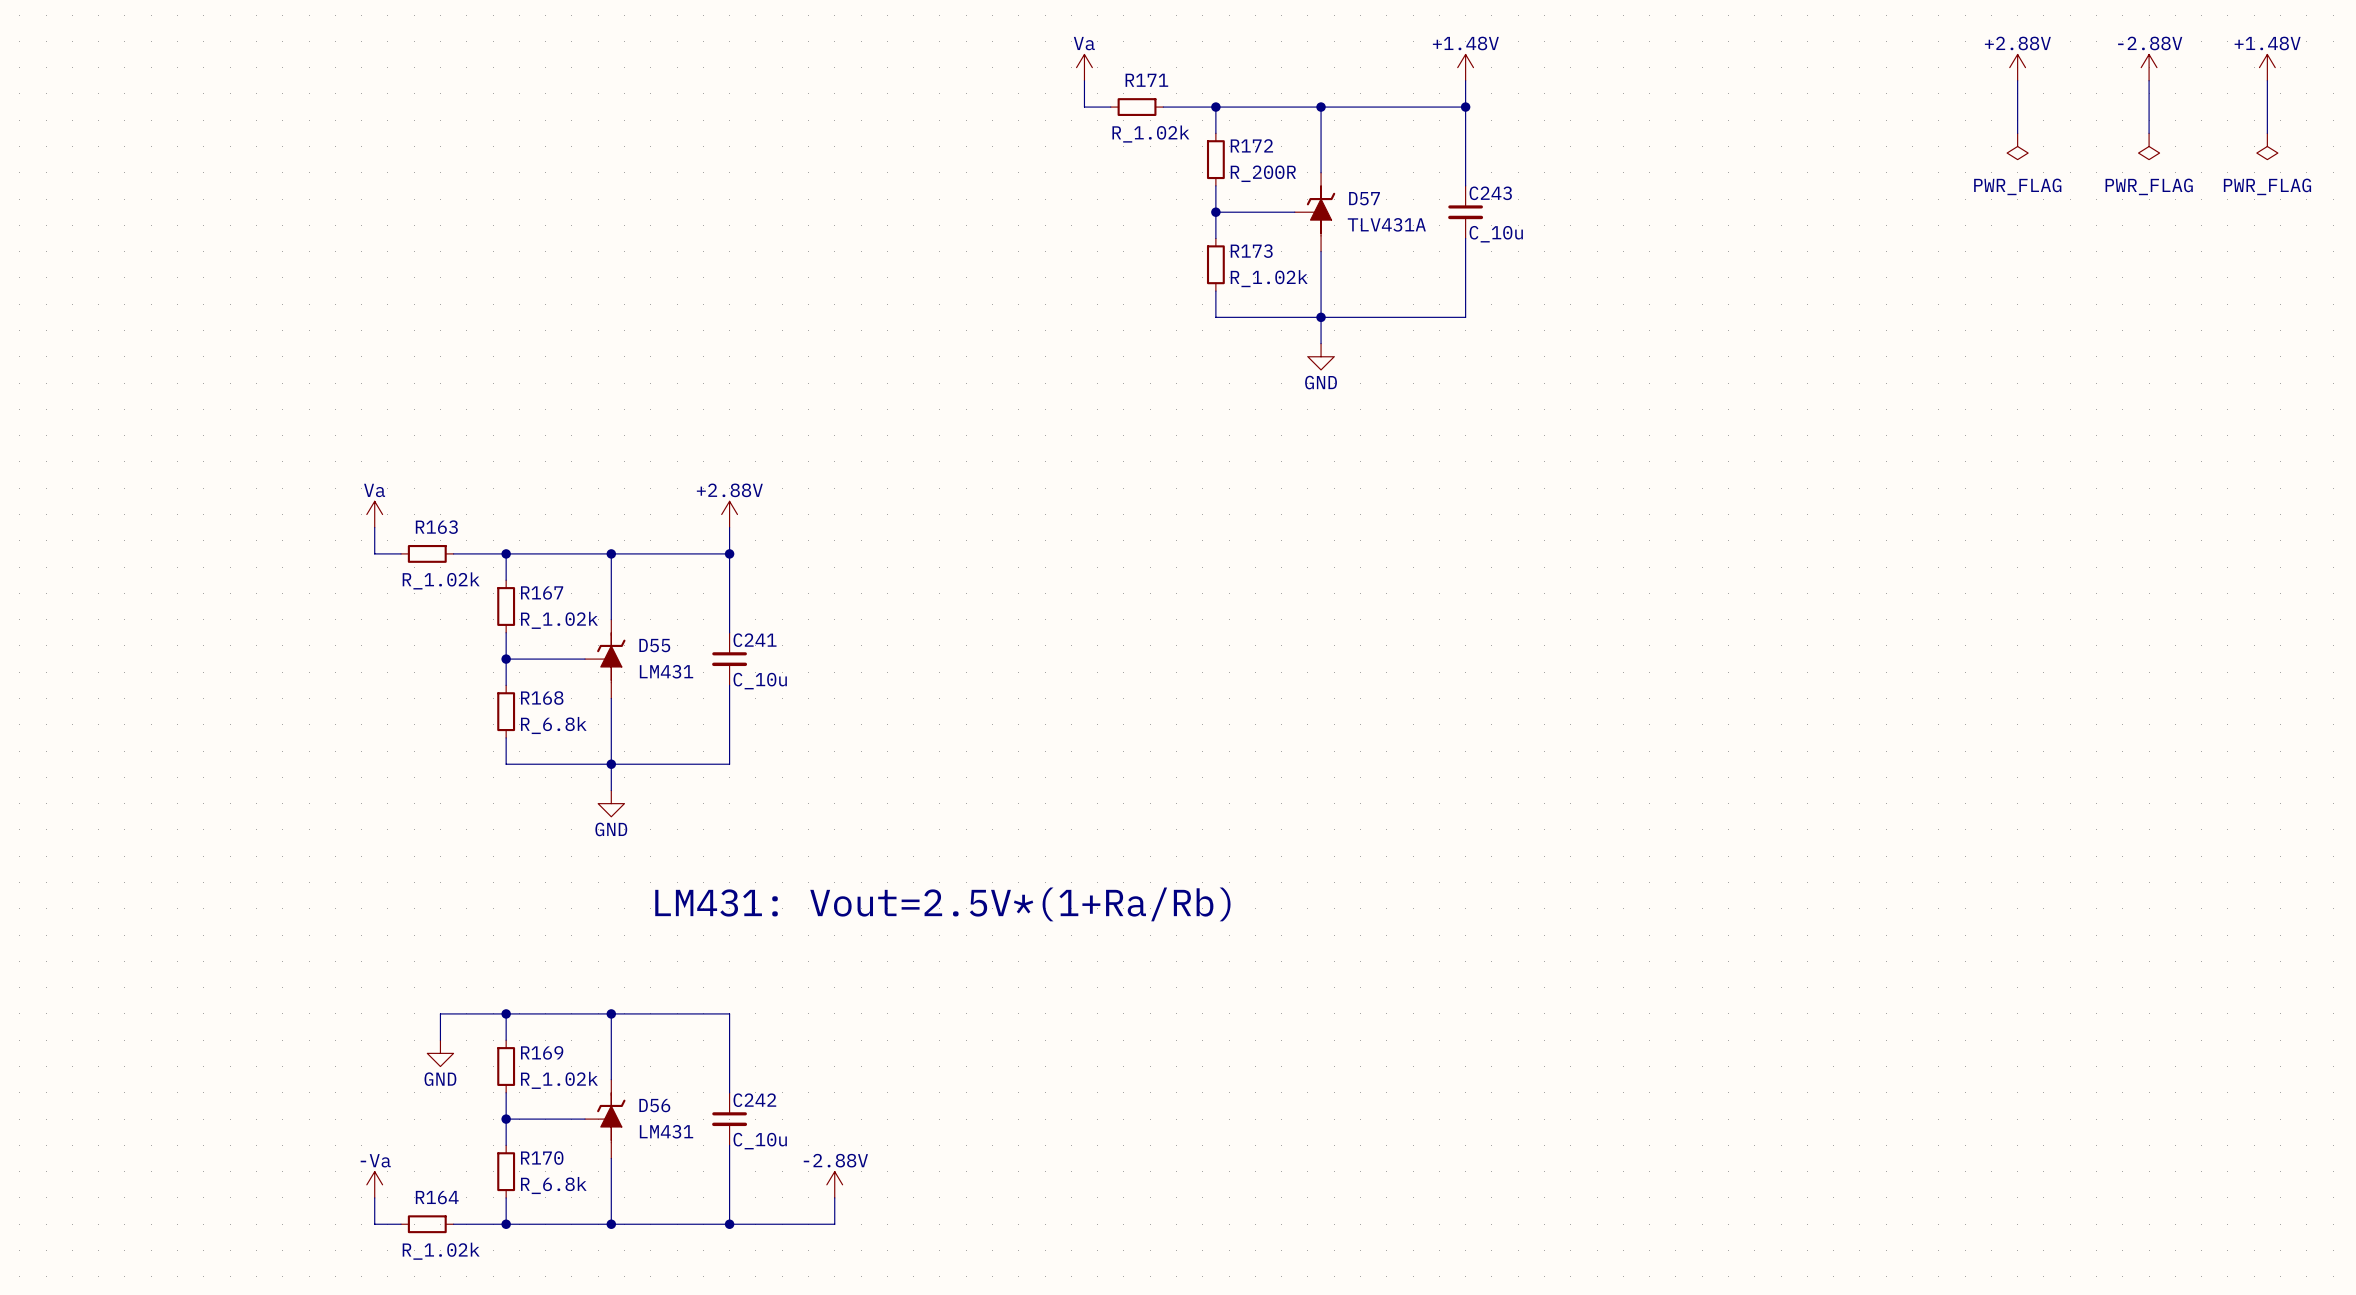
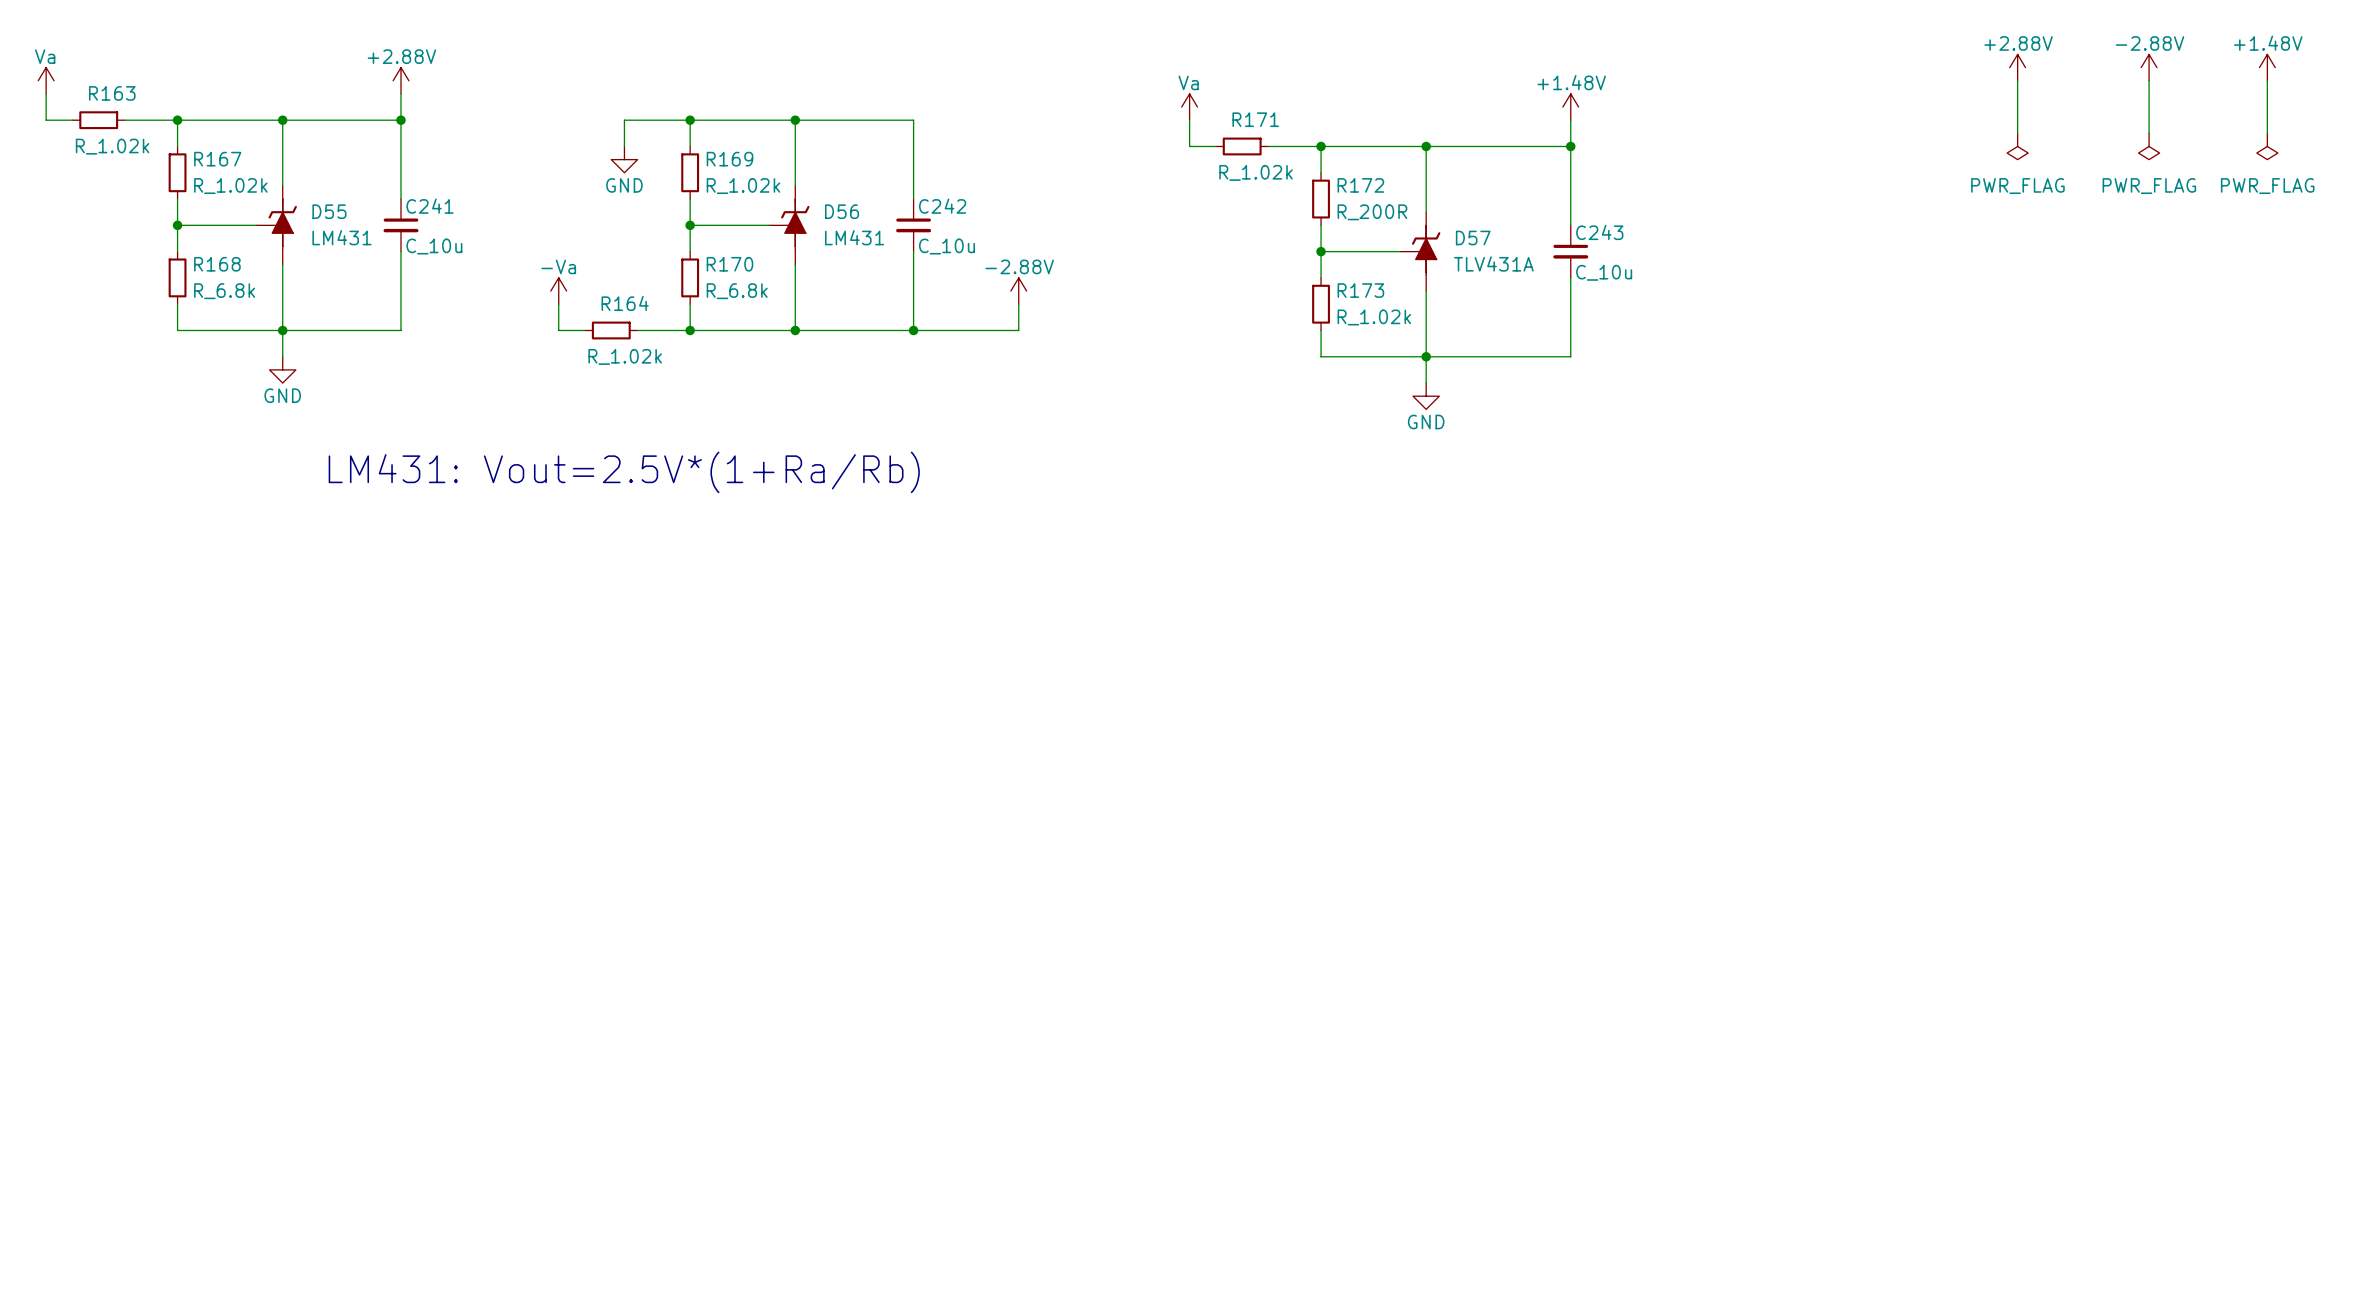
power symbol position: Va (1084, 67) -> Va (1189, 107)
power symbol position: +1.48V (1465, 67) -> +1.48V (1570, 107)
power symbol: none -> Va (46, 80)
power symbol: none -> +2.88V (401, 80)
wire: (1084, 80) (1084, 107) (1110, 107) -> (1189, 120) (1189, 146) (1215, 146)
wire: (1465, 80) (1465, 185) -> (1570, 120) (1570, 225)
wire: none -> (46, 93) (46, 120) (72, 120)
wire: none -> (401, 93) (401, 199)
R171 position: (1137, 107) -> (1242, 146)
wire: (1163, 107) (1465, 107) -> (1268, 146) (1570, 146)
wire: (1215, 107) (1215, 133) -> none
junction: (1215, 107) -> none
wire: (1321, 107) (1321, 146) -> none
junction position: (1321, 107) -> (1321, 146)
junction position: (1465, 107) -> (1426, 146)
wire: none -> (124, 120) (401, 120)
wire: none -> (177, 120) (177, 146)
junction: none -> (177, 120)
wire: none -> (282, 120) (282, 185)
junction: none -> (282, 120)
junction: none -> (401, 120)
wire: none -> (690, 120) (690, 146)
junction: none -> (690, 120)
wire: none -> (795, 120) (795, 185)
junction: none -> (795, 120)
wire: none -> (624, 146) (624, 120) (913, 120) (913, 199)
wire: none -> (1426, 146) (1426, 212)
junction: none -> (1570, 146)
power symbol: none -> GND (624, 159)
R172 position: (1215, 159) -> (1321, 199)
wire: (1215, 185) (1215, 238) -> none
wire: none -> (177, 199) (177, 251)
wire: none -> (690, 199) (690, 251)
wire: (1215, 212) (1294, 212) -> none
junction: (1215, 212) -> none
D57 position: (1314, 212) -> (1420, 251)
C243 position: (1465, 212) -> (1570, 251)
wire: none -> (177, 225) (256, 225)
junction: none -> (177, 225)
wire: none -> (690, 225) (769, 225)
junction: none -> (690, 225)
wire: none -> (1321, 225) (1321, 251) (1399, 251)
wire: (1465, 238) (1465, 317) (1215, 317) (1215, 291) -> none
wire: none -> (401, 251) (401, 330) (177, 330) (177, 304)
wire: none -> (913, 251) (913, 330)
junction: none -> (1321, 251)
wire: none -> (282, 264) (282, 356)
wire: none -> (795, 264) (795, 330)
R173 position: (1215, 264) -> (1321, 304)
wire: (1321, 277) (1321, 330) -> none
wire: none -> (1570, 277) (1570, 356) (1321, 356) (1321, 343)
power symbol: none -> -Va (558, 291)
power symbol: none -> -2.88V (1018, 291)
wire: none -> (1426, 291) (1426, 383)
wire: none -> (558, 304) (558, 330) (585, 330)
wire: none -> (690, 304) (690, 330)
wire: none -> (1018, 304) (1018, 330) (637, 330)
junction: (1321, 317) -> none
junction: none -> (282, 330)
junction: none -> (690, 330)
junction: none -> (795, 330)
junction: none -> (913, 330)
power symbol position: GND (1321, 356) -> GND (1426, 396)
junction: none -> (1426, 356)
power symbol: none -> GND (282, 369)
text: none -> LM431: Vout=2.5V*(1+Ra/Rb) (624, 472)
power symbol: Va (374, 514) -> none
power symbol: +2.88V (729, 514) -> none
wire: (374, 527) (374, 553) (401, 553) -> none
wire: (729, 527) (729, 632) -> none
R163 position: (427, 553) -> (98, 120)
wire: (453, 553) (729, 553) -> none
wire: (506, 553) (506, 580) -> none
junction: (506, 553) -> none
wire: (611, 553) (611, 619) -> none
junction: (611, 553) -> none
junction: (729, 553) -> none
R167 position: (506, 606) -> (177, 172)
wire: (506, 632) (506, 685) -> none
wire: (506, 659) (585, 659) -> none
junction: (506, 659) -> none
D55 position: (605, 659) -> (276, 225)
C241 position: (729, 659) -> (401, 225)
wire: (729, 685) (729, 764) (506, 764) (506, 737) -> none
wire: (611, 698) (611, 790) -> none
R168 position: (506, 711) -> (177, 277)
junction: (611, 764) -> none
power symbol: GND (611, 803) -> none
text: LM431: Vout=2.5V*(1+Ra/Rb) (942, 904) -> none
wire: (506, 1013) (506, 1040) -> none
junction: (506, 1013) -> none
wire: (611, 1013) (611, 1079) -> none
junction: (611, 1013) -> none
wire: (440, 1040) (440, 1013) (729, 1013) (729, 1092) -> none
power symbol: GND (440, 1053) -> none
R169 position: (506, 1066) -> (690, 172)
wire: (506, 1092) (506, 1145) -> none
wire: (506, 1119) (585, 1119) -> none
junction: (506, 1119) -> none
D56 position: (605, 1119) -> (789, 225)
C242 position: (729, 1119) -> (913, 225)
wire: (729, 1145) (729, 1224) -> none
wire: (611, 1158) (611, 1224) -> none
R170 position: (506, 1171) -> (690, 277)
power symbol: -Va (374, 1184) -> none
power symbol: -2.88V (834, 1184) -> none
wire: (374, 1197) (374, 1224) (401, 1224) -> none
wire: (506, 1197) (506, 1224) -> none
wire: (834, 1197) (834, 1224) (453, 1224) -> none
R164 position: (427, 1224) -> (611, 330)
junction: (506, 1224) -> none
junction: (611, 1224) -> none
junction: (729, 1224) -> none

